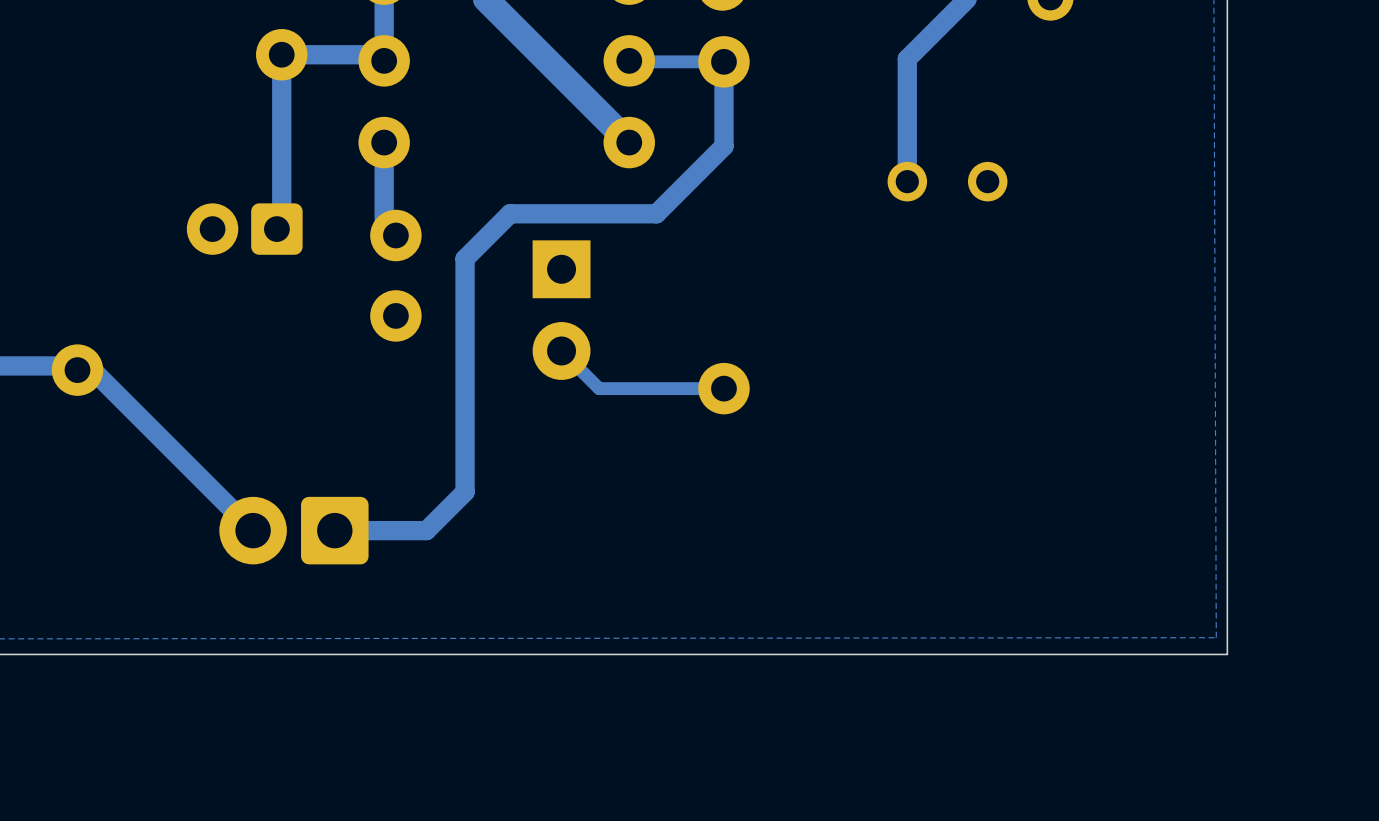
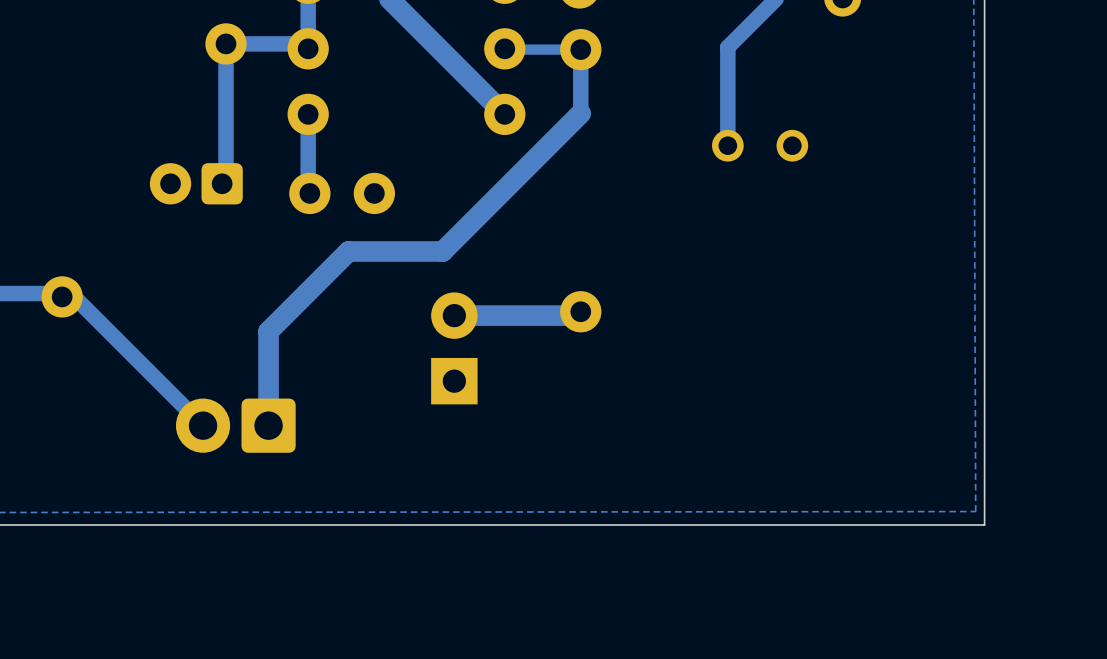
track: (723, 141) (723, 146) (656, 213) (510, 213) (465, 258) (465, 492) (426, 530) (334, 530) -> (580, 113) (442, 251) (348, 251) (268, 331) (268, 425)
part rotation: 0° (395, 275) -> 90° clockwise (342, 193)
part rotation: 0° (561, 310) -> 180° (454, 348)
part position: (561, 310) -> (454, 348)
track: (561, 350) (599, 388) (723, 388) -> (454, 315) (576, 315) (580, 311)

